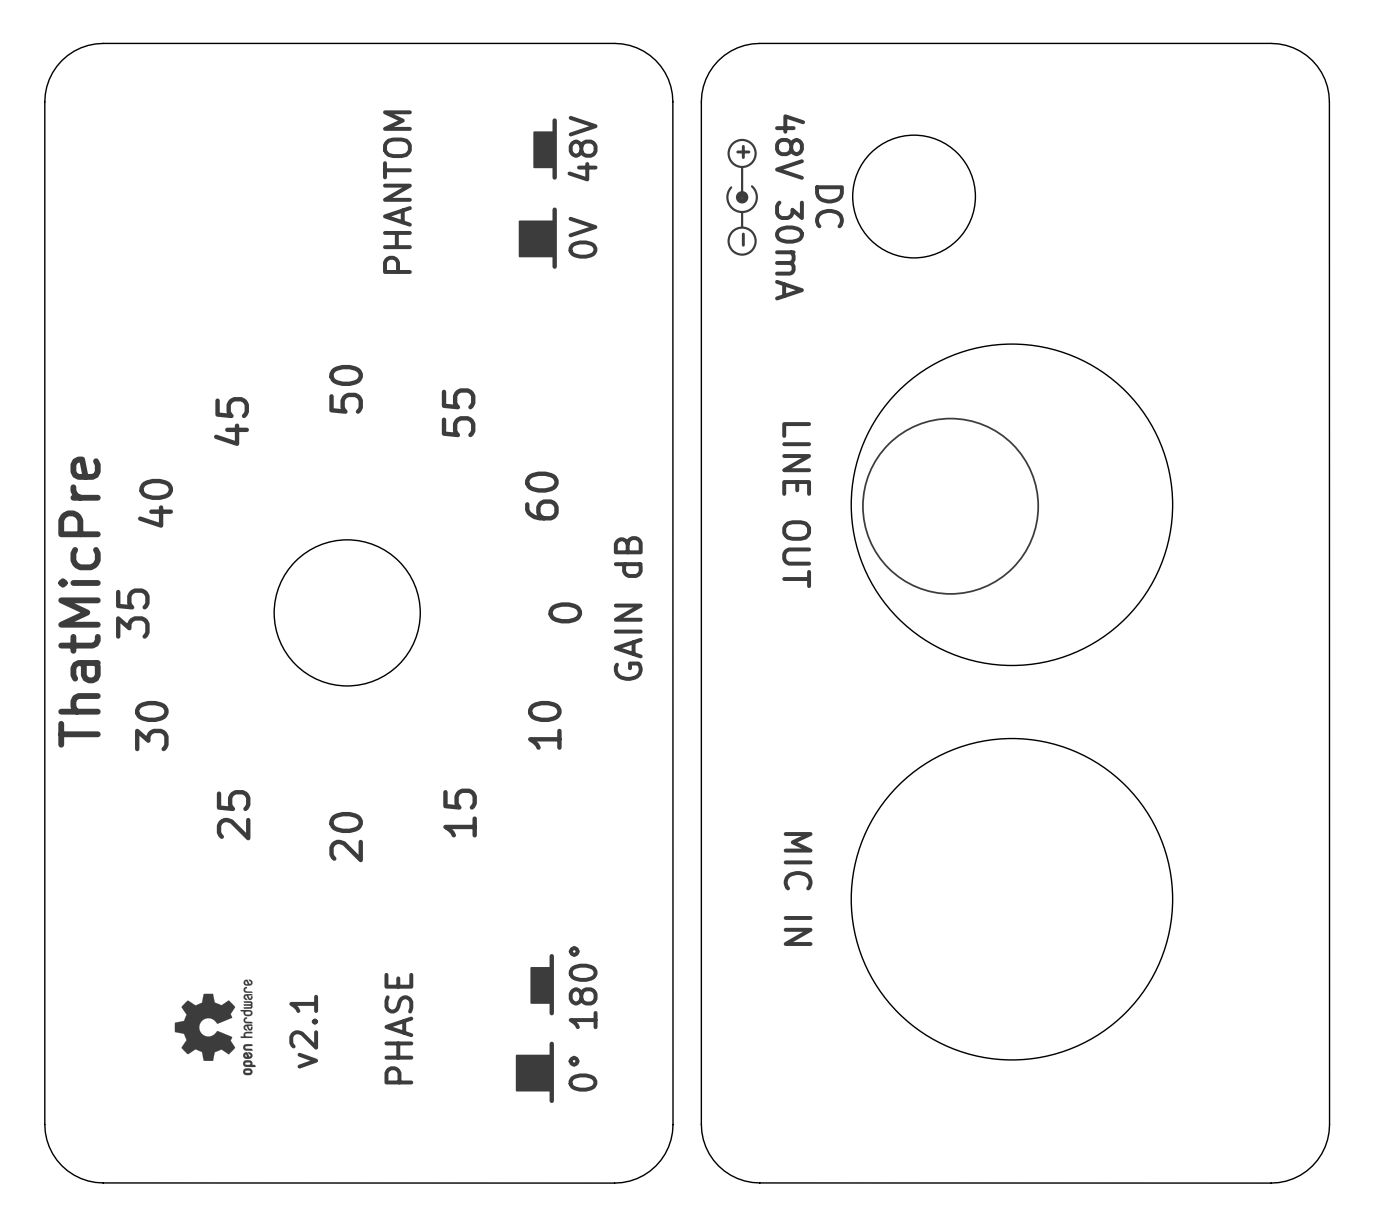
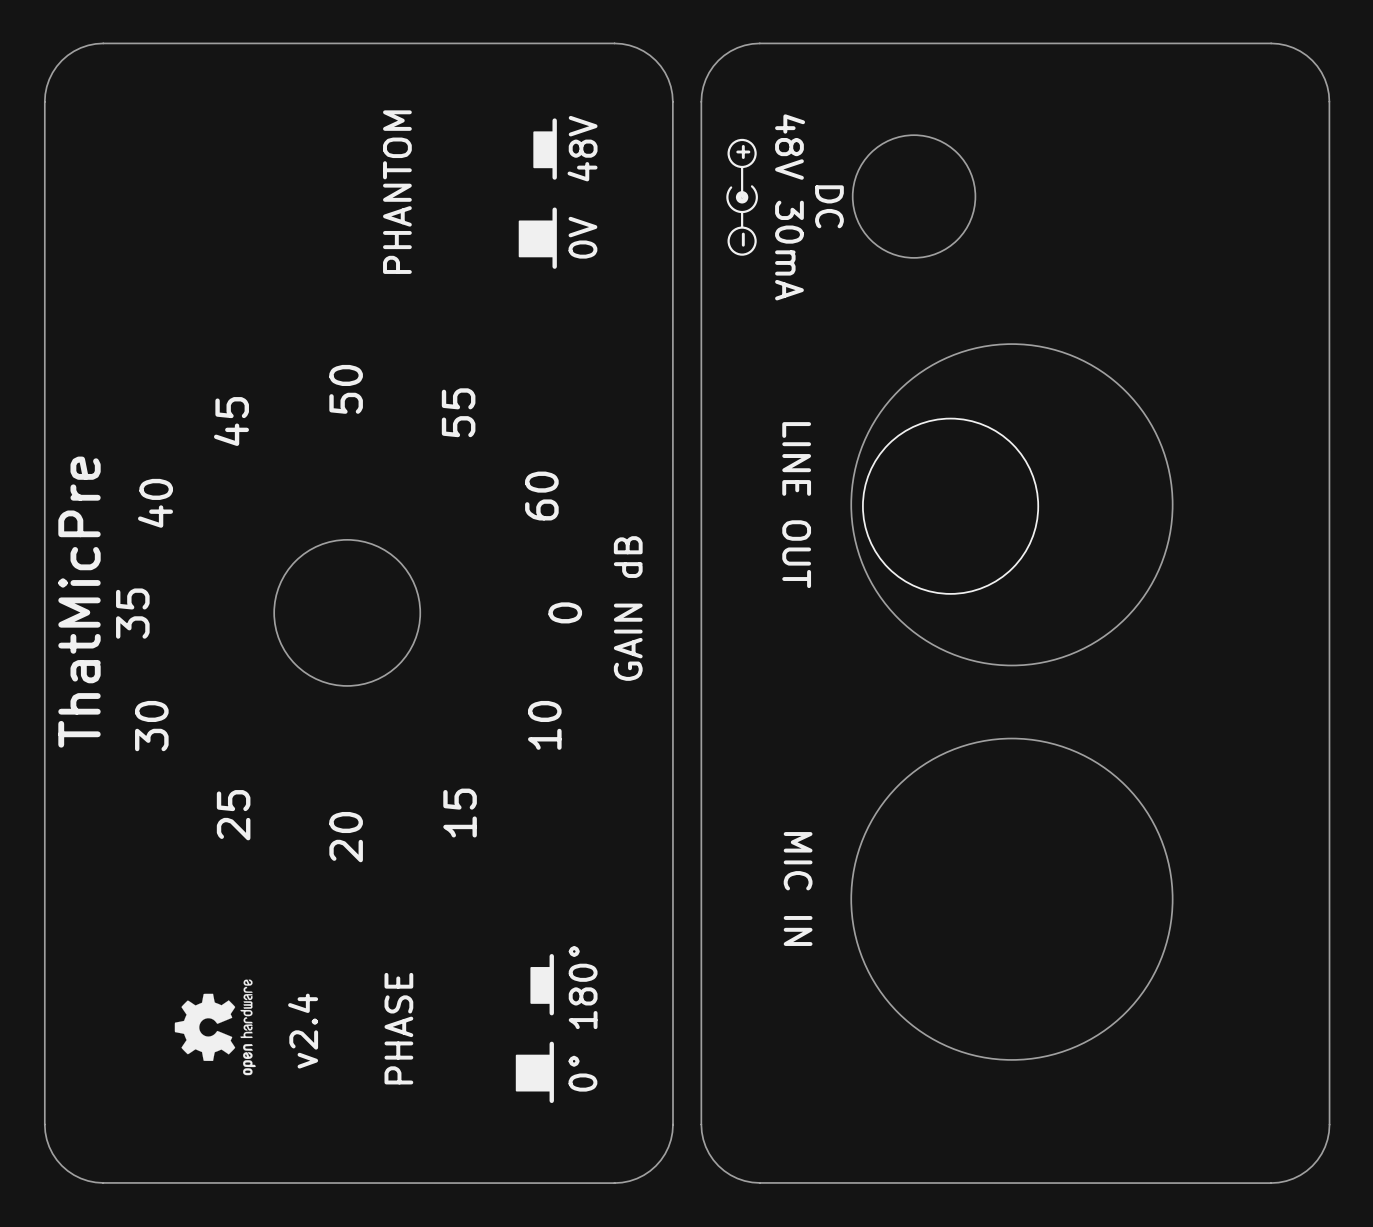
text: v2.1 (303, 1031) -> v2.4 (303, 1031)

